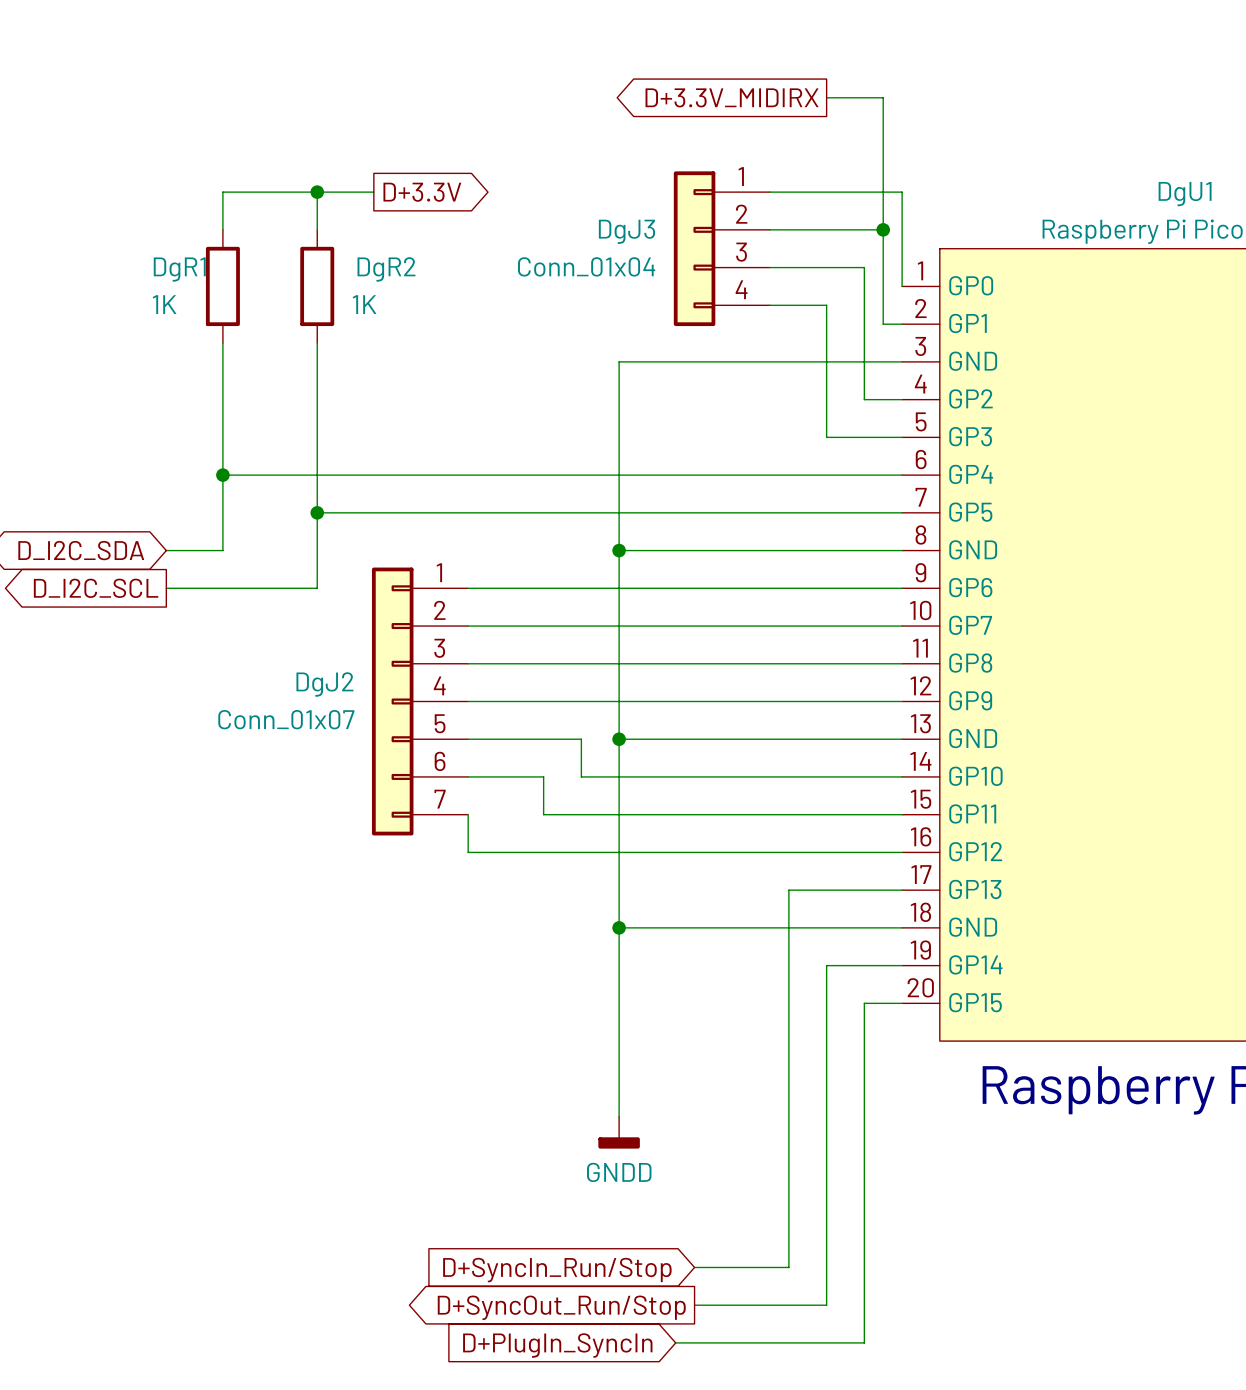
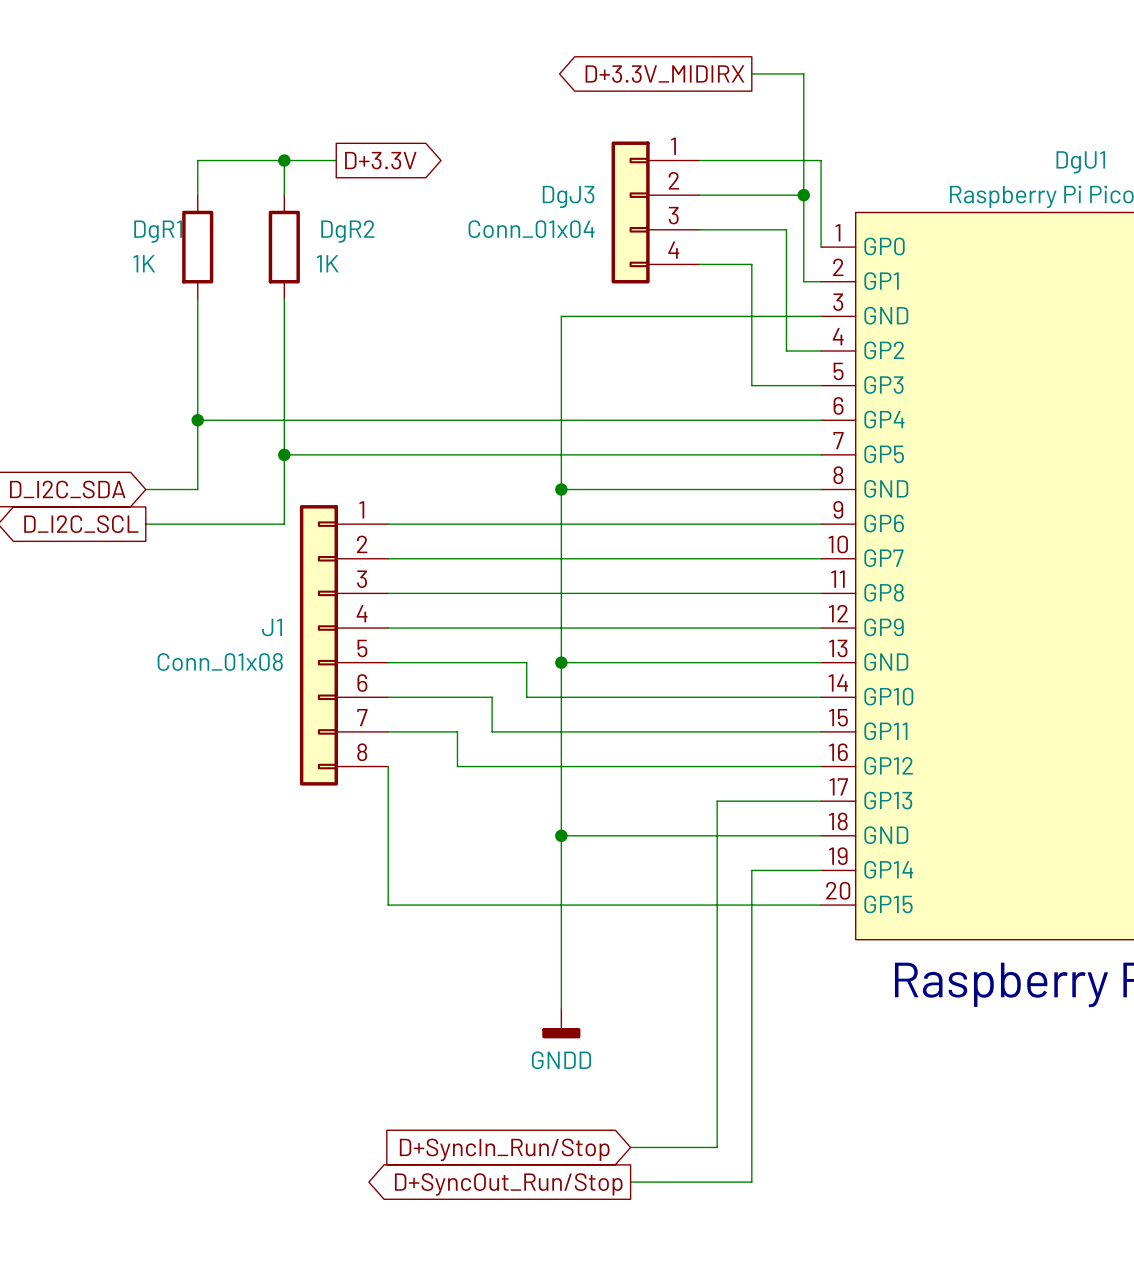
DgJ2: Conn_01x07 (420, 701) -> none
J1: none -> Conn_01x08 (344, 645)
wire: (468, 814) (468, 852) (505, 852) -> (388, 731) (457, 731) (457, 766)
wire: (864, 1003) (864, 1342) (675, 1342) -> (786, 905) (388, 905) (388, 766)
global label: D+PlugIn_SyncIn (557, 1345) -> none

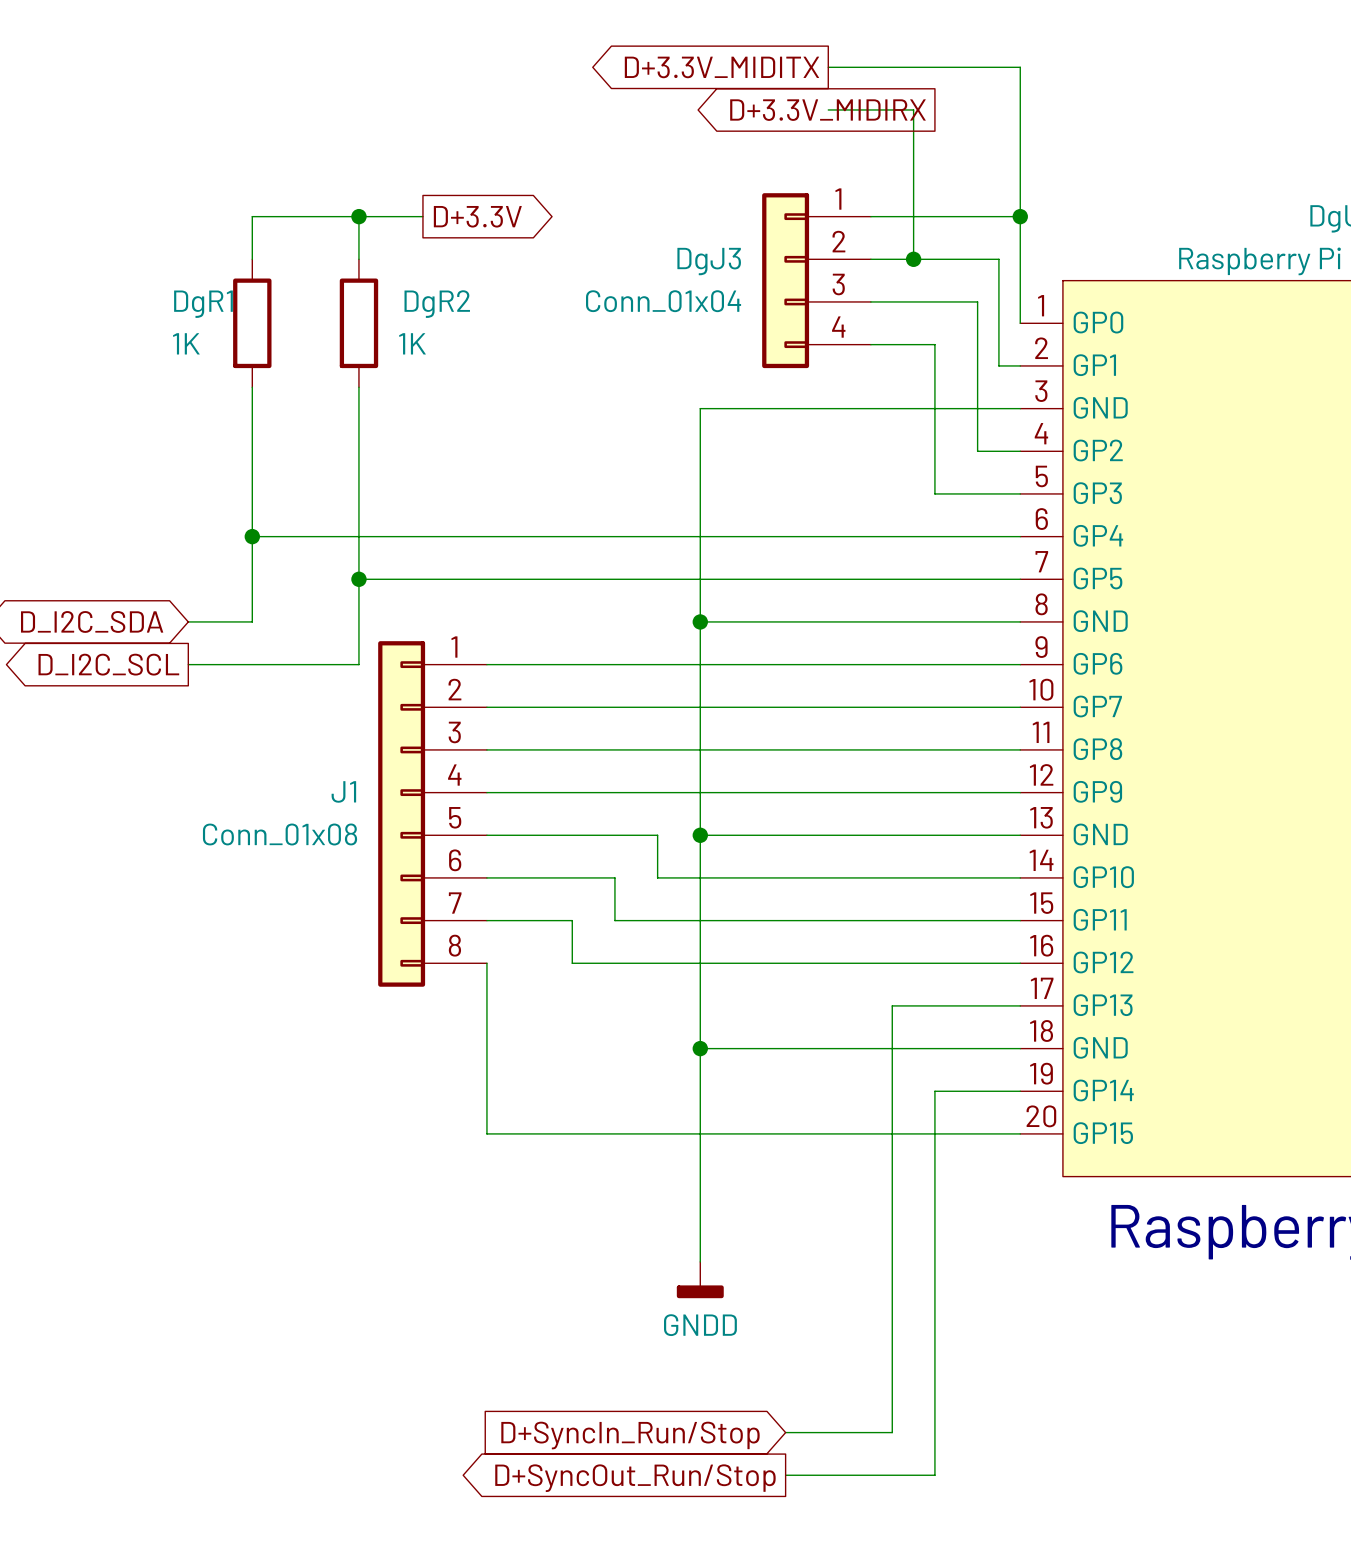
global label: none -> D+3.3V_MIDITX (721, 67)
wire: none -> (828, 67) (1020, 67) (1020, 216)
wire: none -> (828, 109) (913, 109) (913, 259)
wire: (751, 73) (803, 73) (803, 195) -> none
junction: none -> (1020, 216)
junction: none -> (913, 259)
junction: (803, 195) -> none

